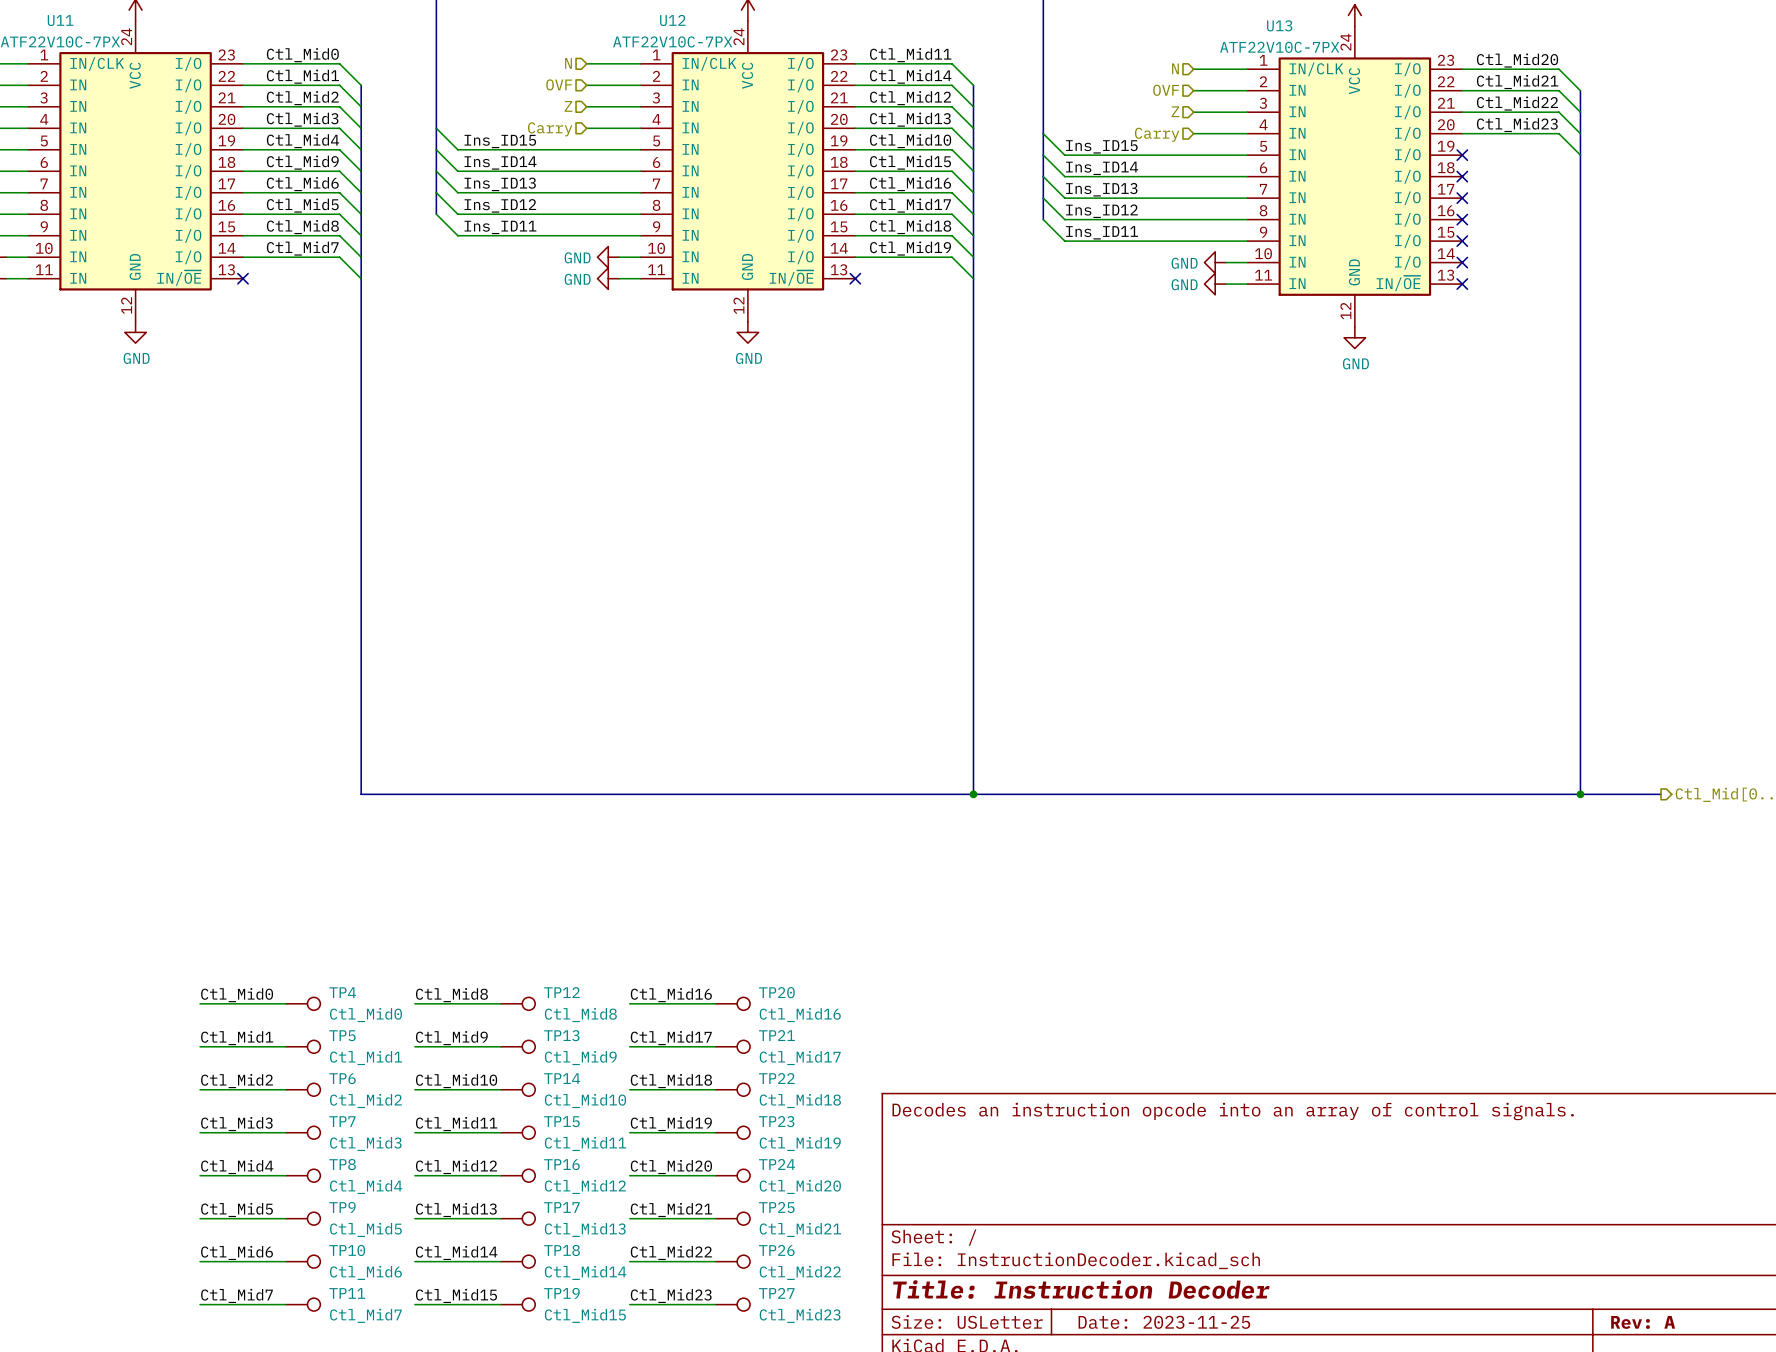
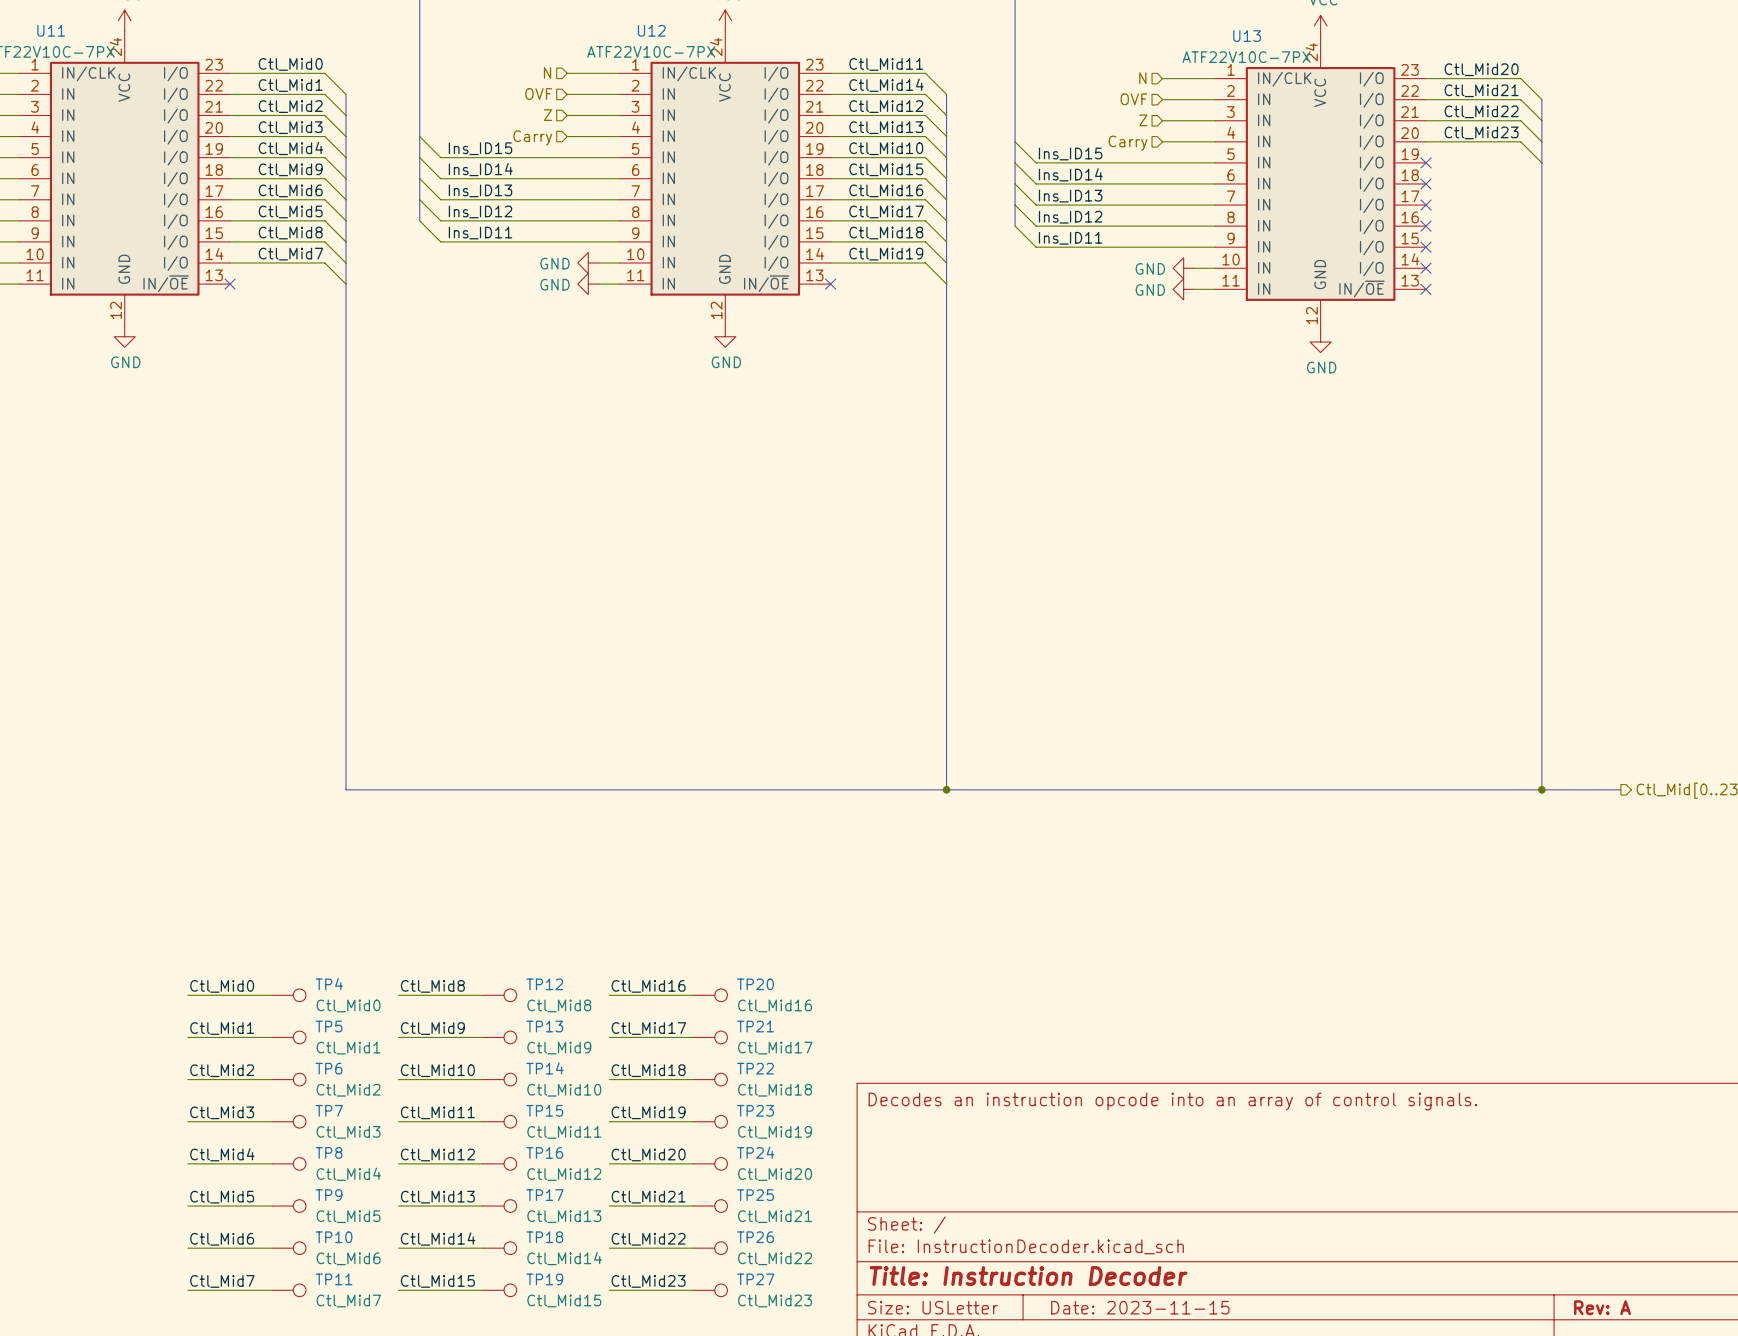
title block: Date: 2023-11-25 (1164, 1322) -> Date: 2023-11-15 (1140, 1307)

